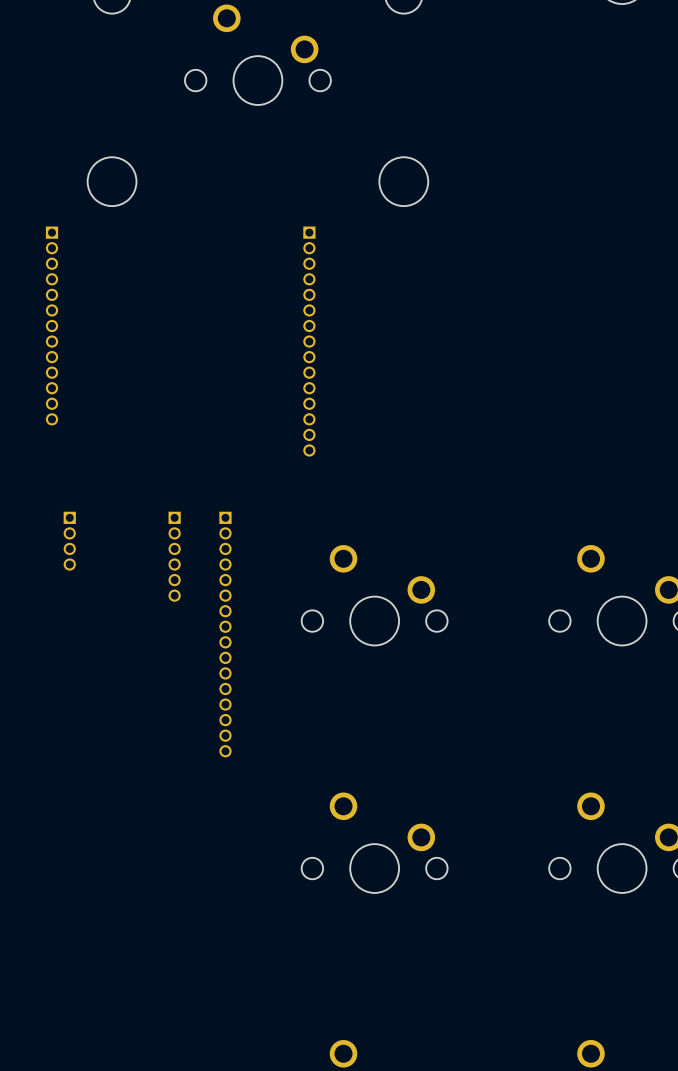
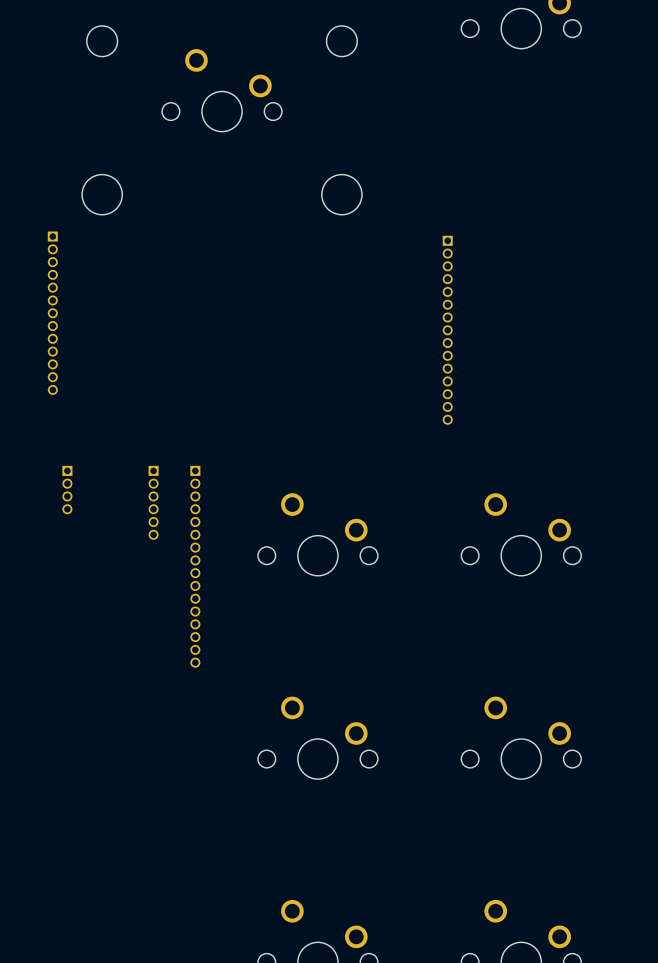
part position: (309, 341) -> (447, 330)

